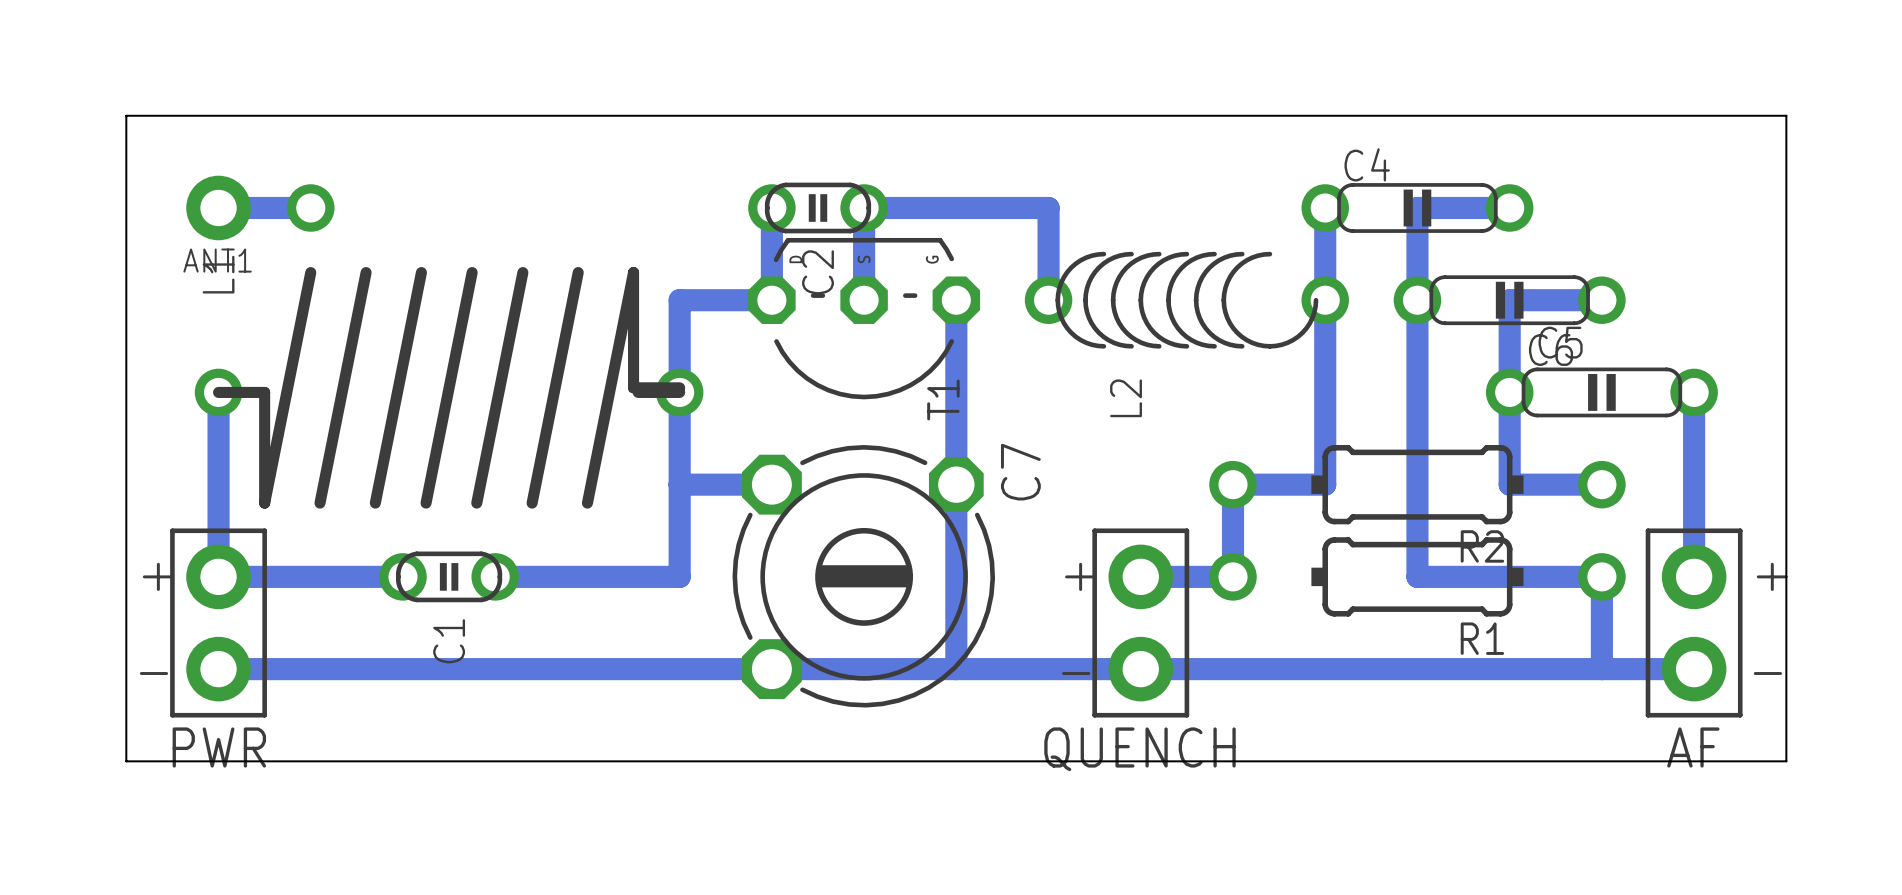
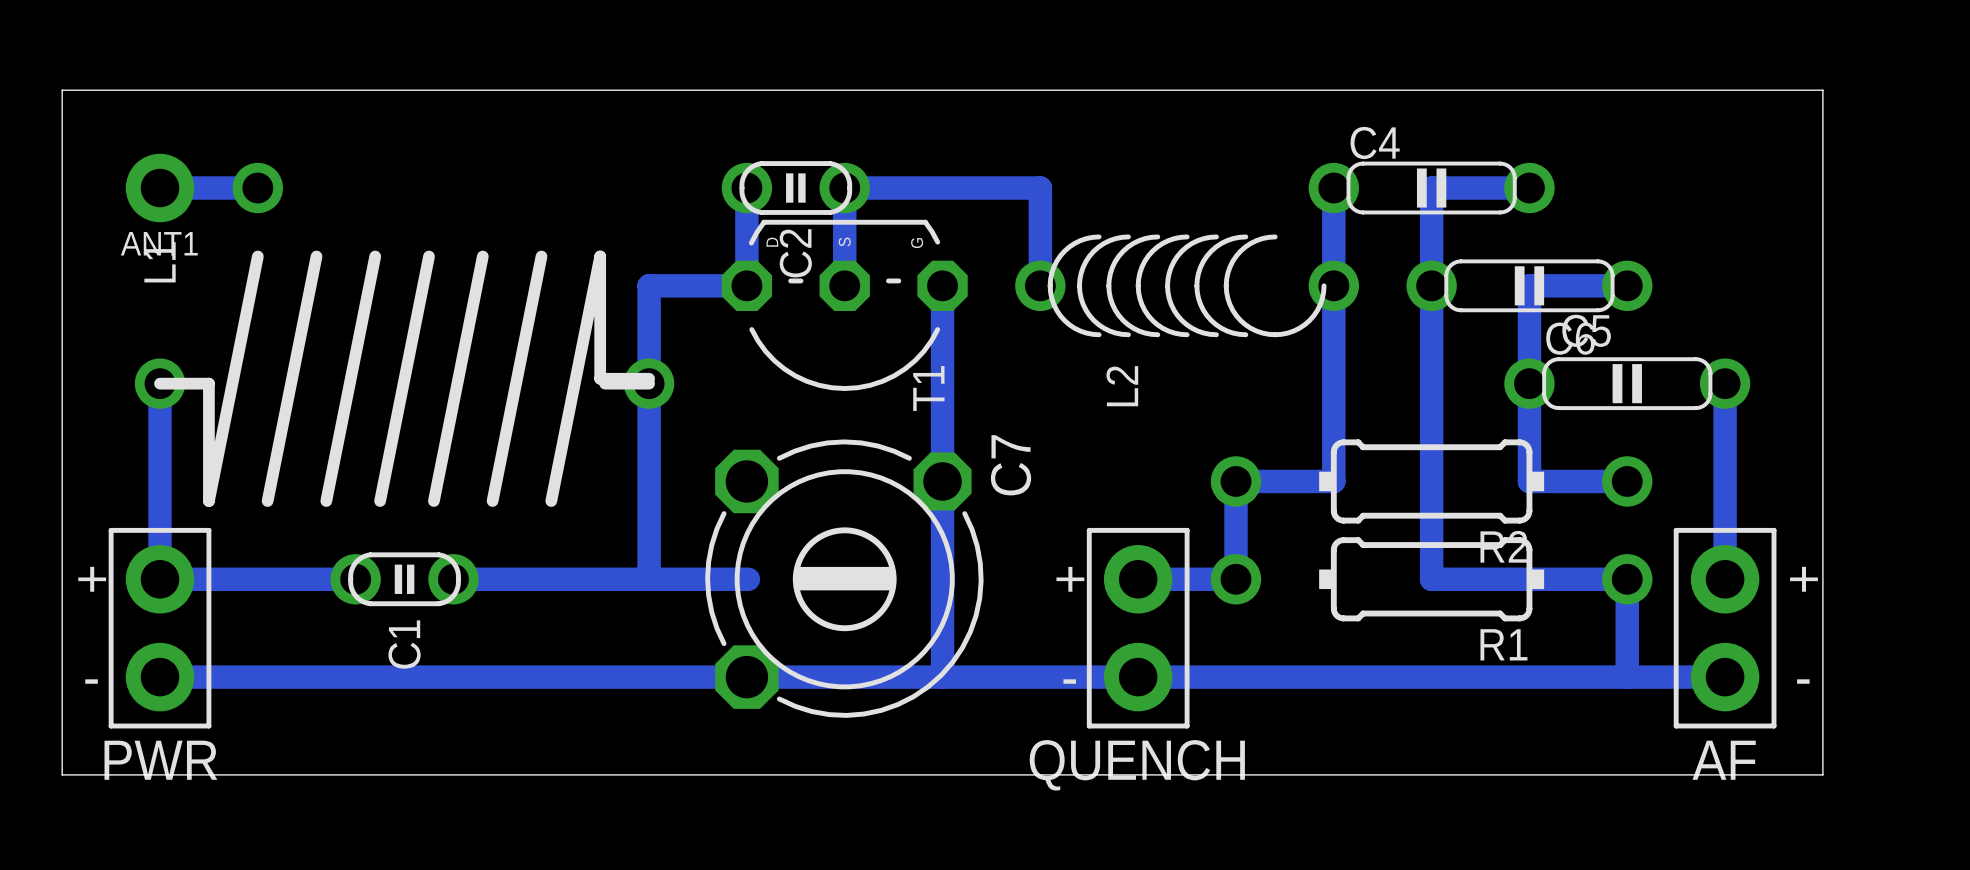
bottom track: (679, 484) (771, 484) -> none
bottom track: none -> (649, 579) (748, 579)

